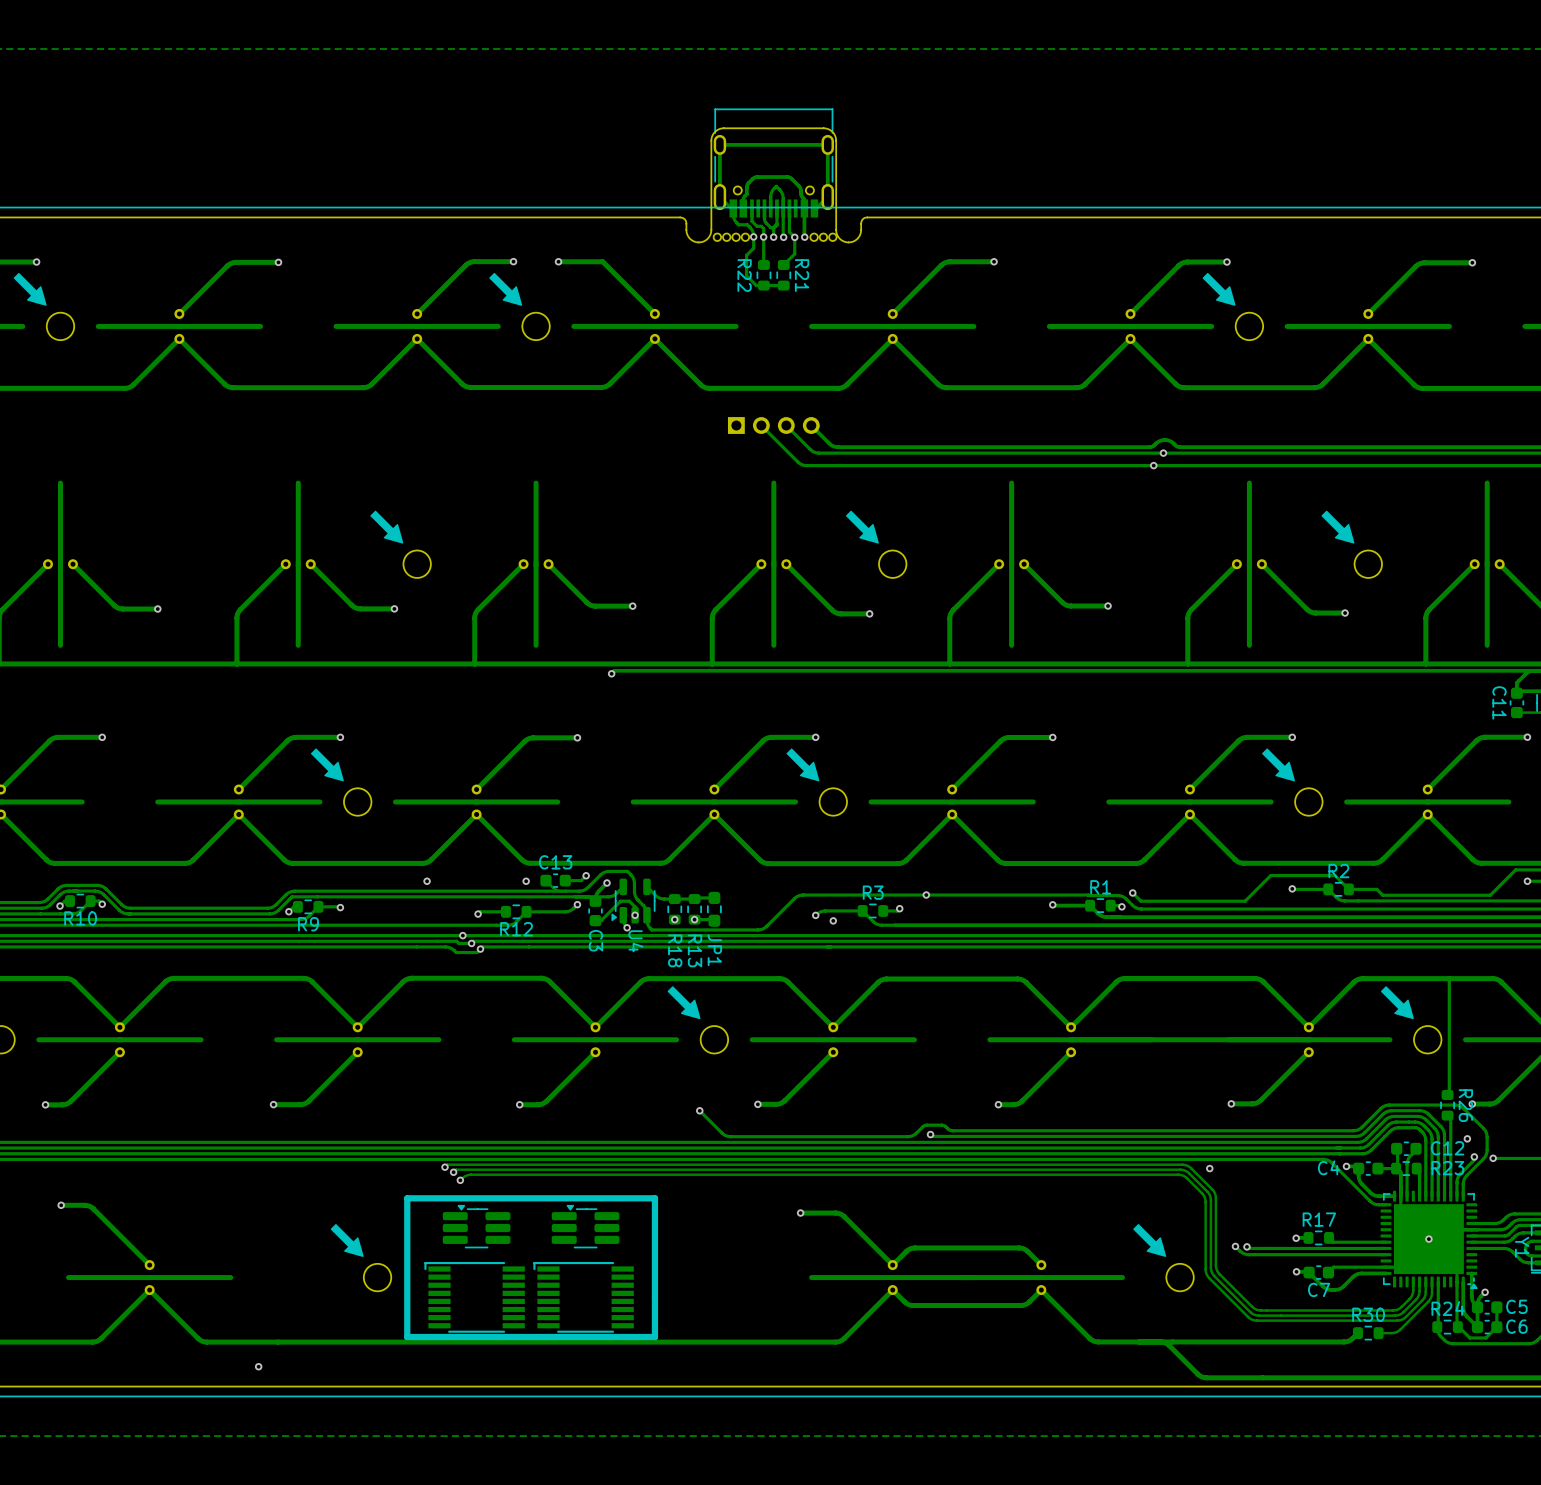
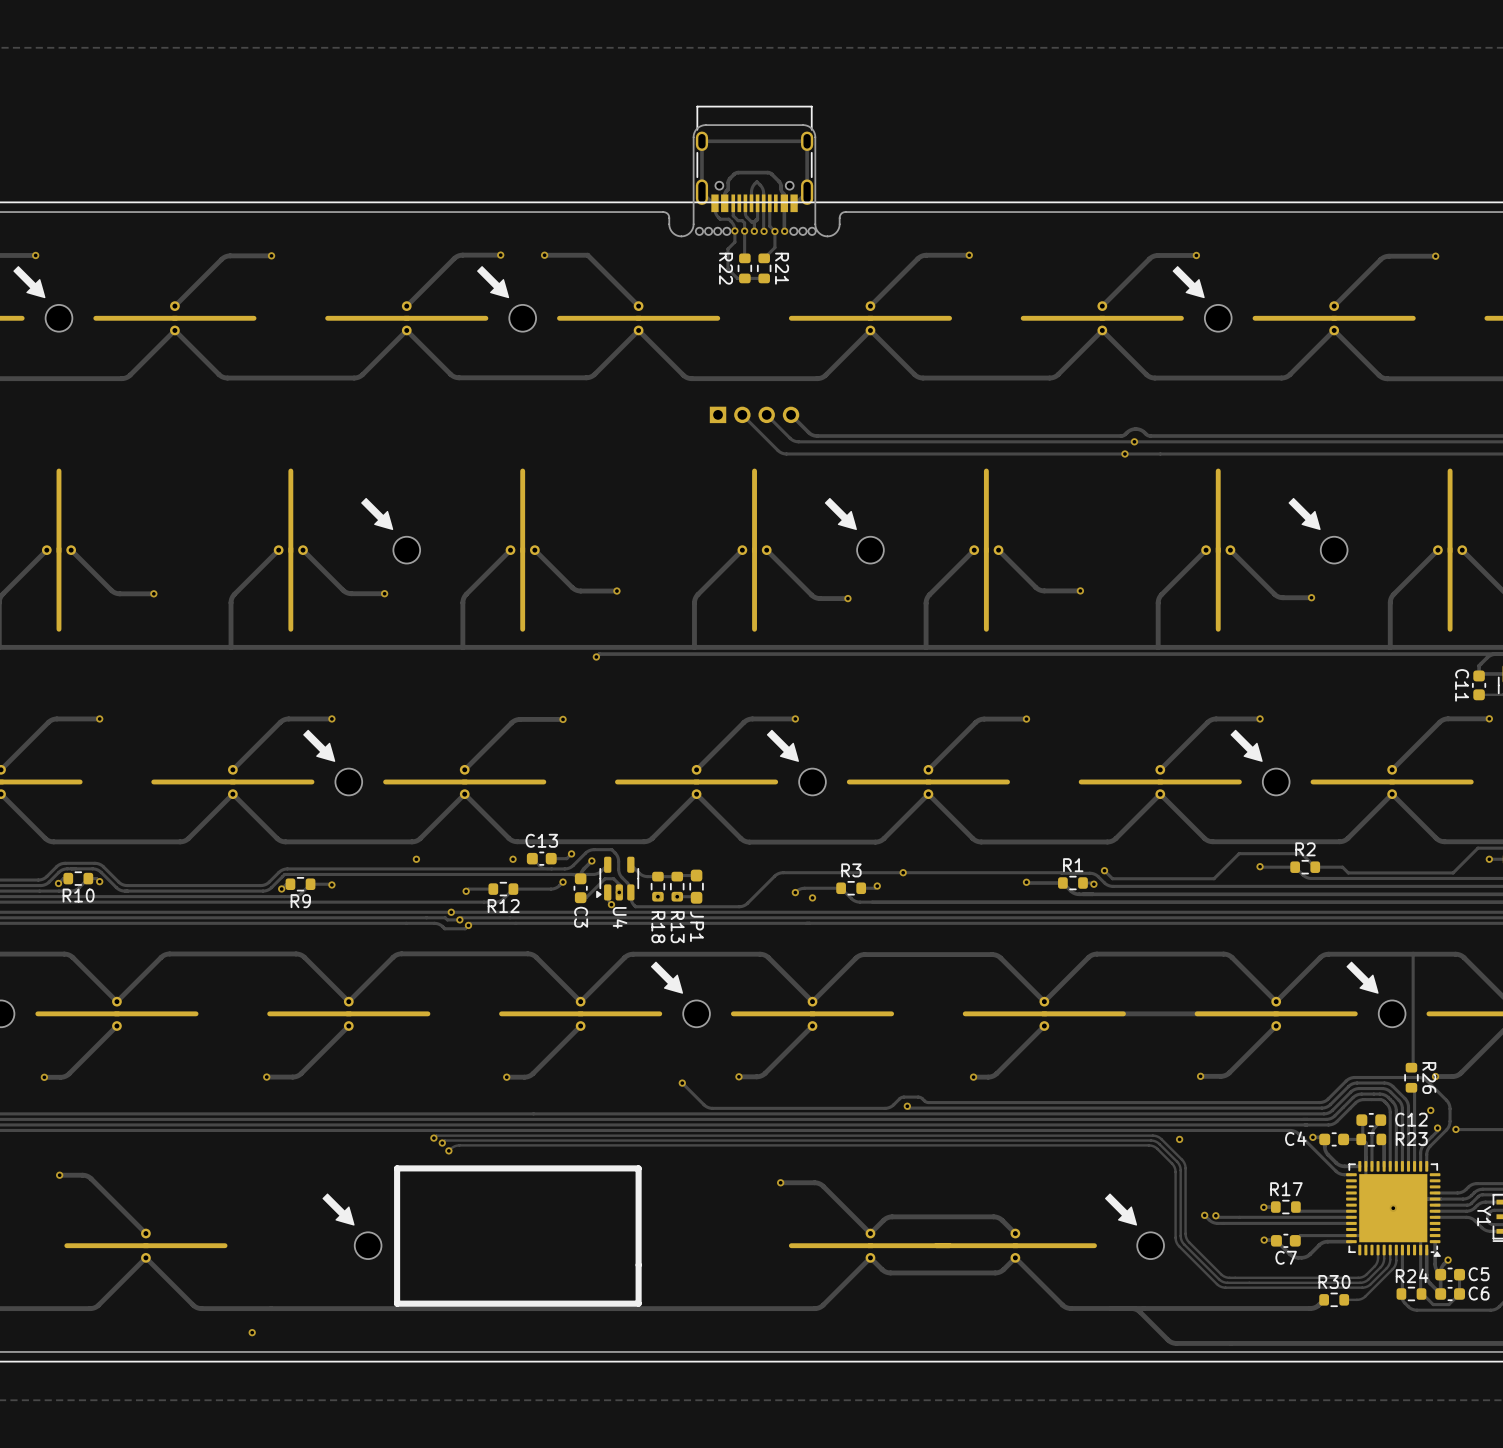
part: (476, 1226) -> none
part: (585, 1226) -> none
part: (474, 1297) -> none
part: (583, 1297) -> none

